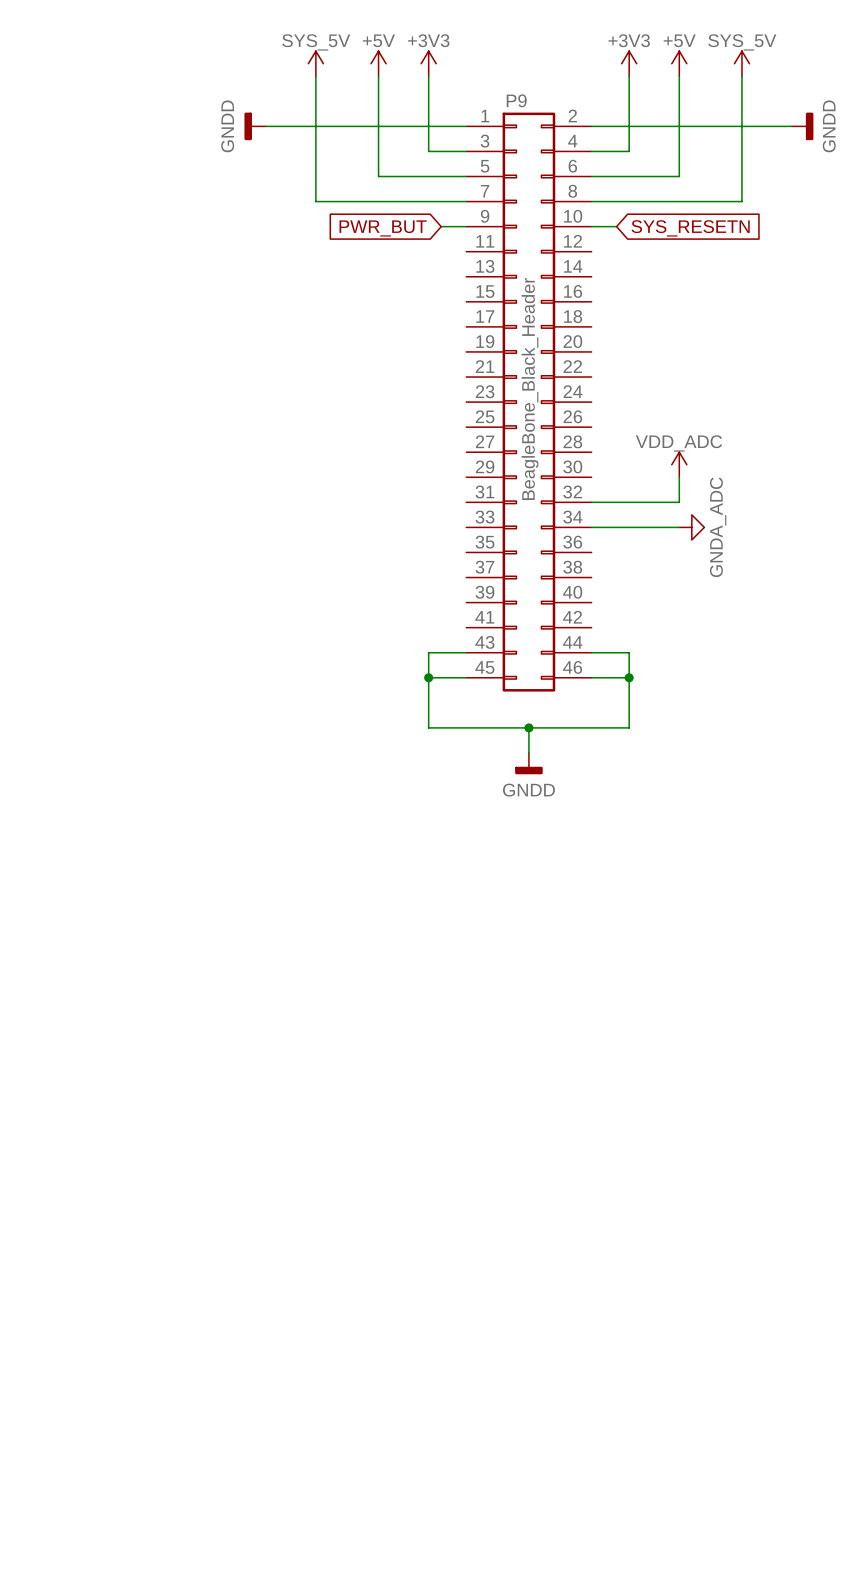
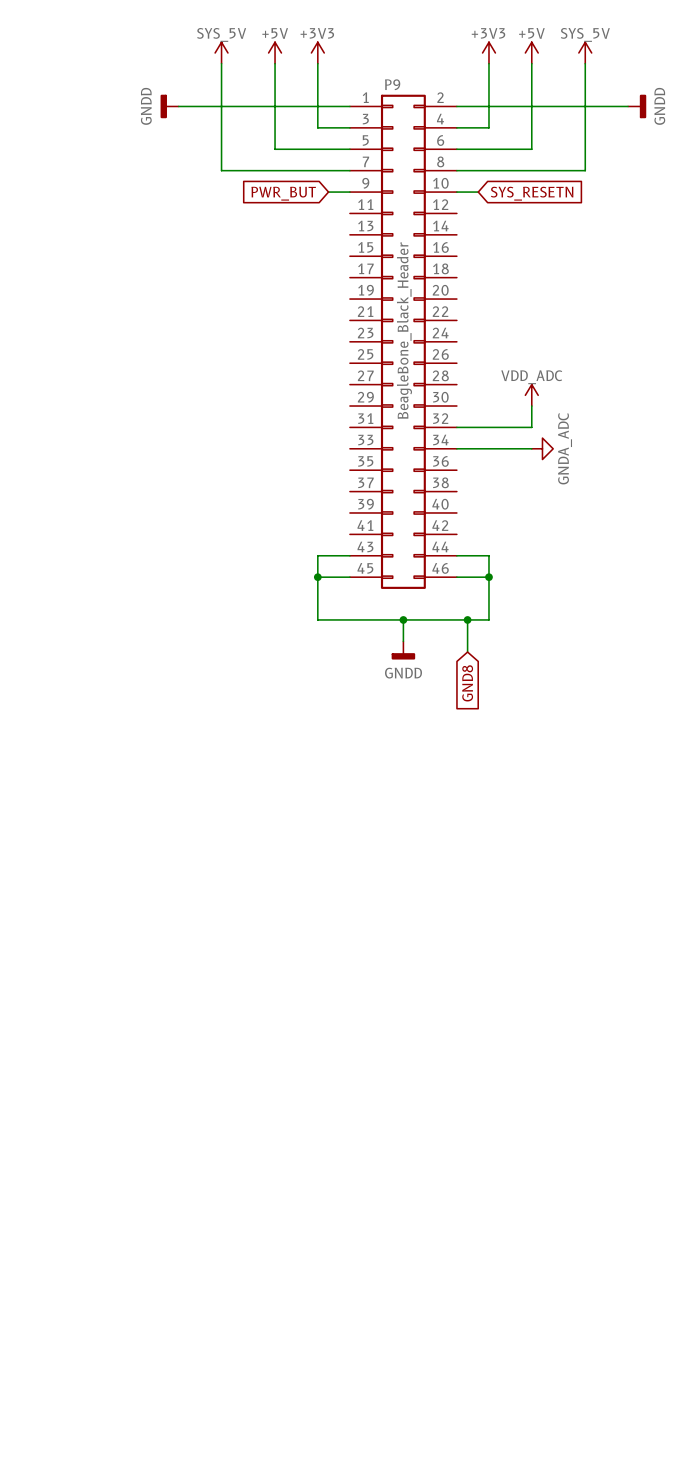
wire: none -> (467, 619) (467, 652)
junction: none -> (467, 619)
global label: none -> GND8 (467, 683)

